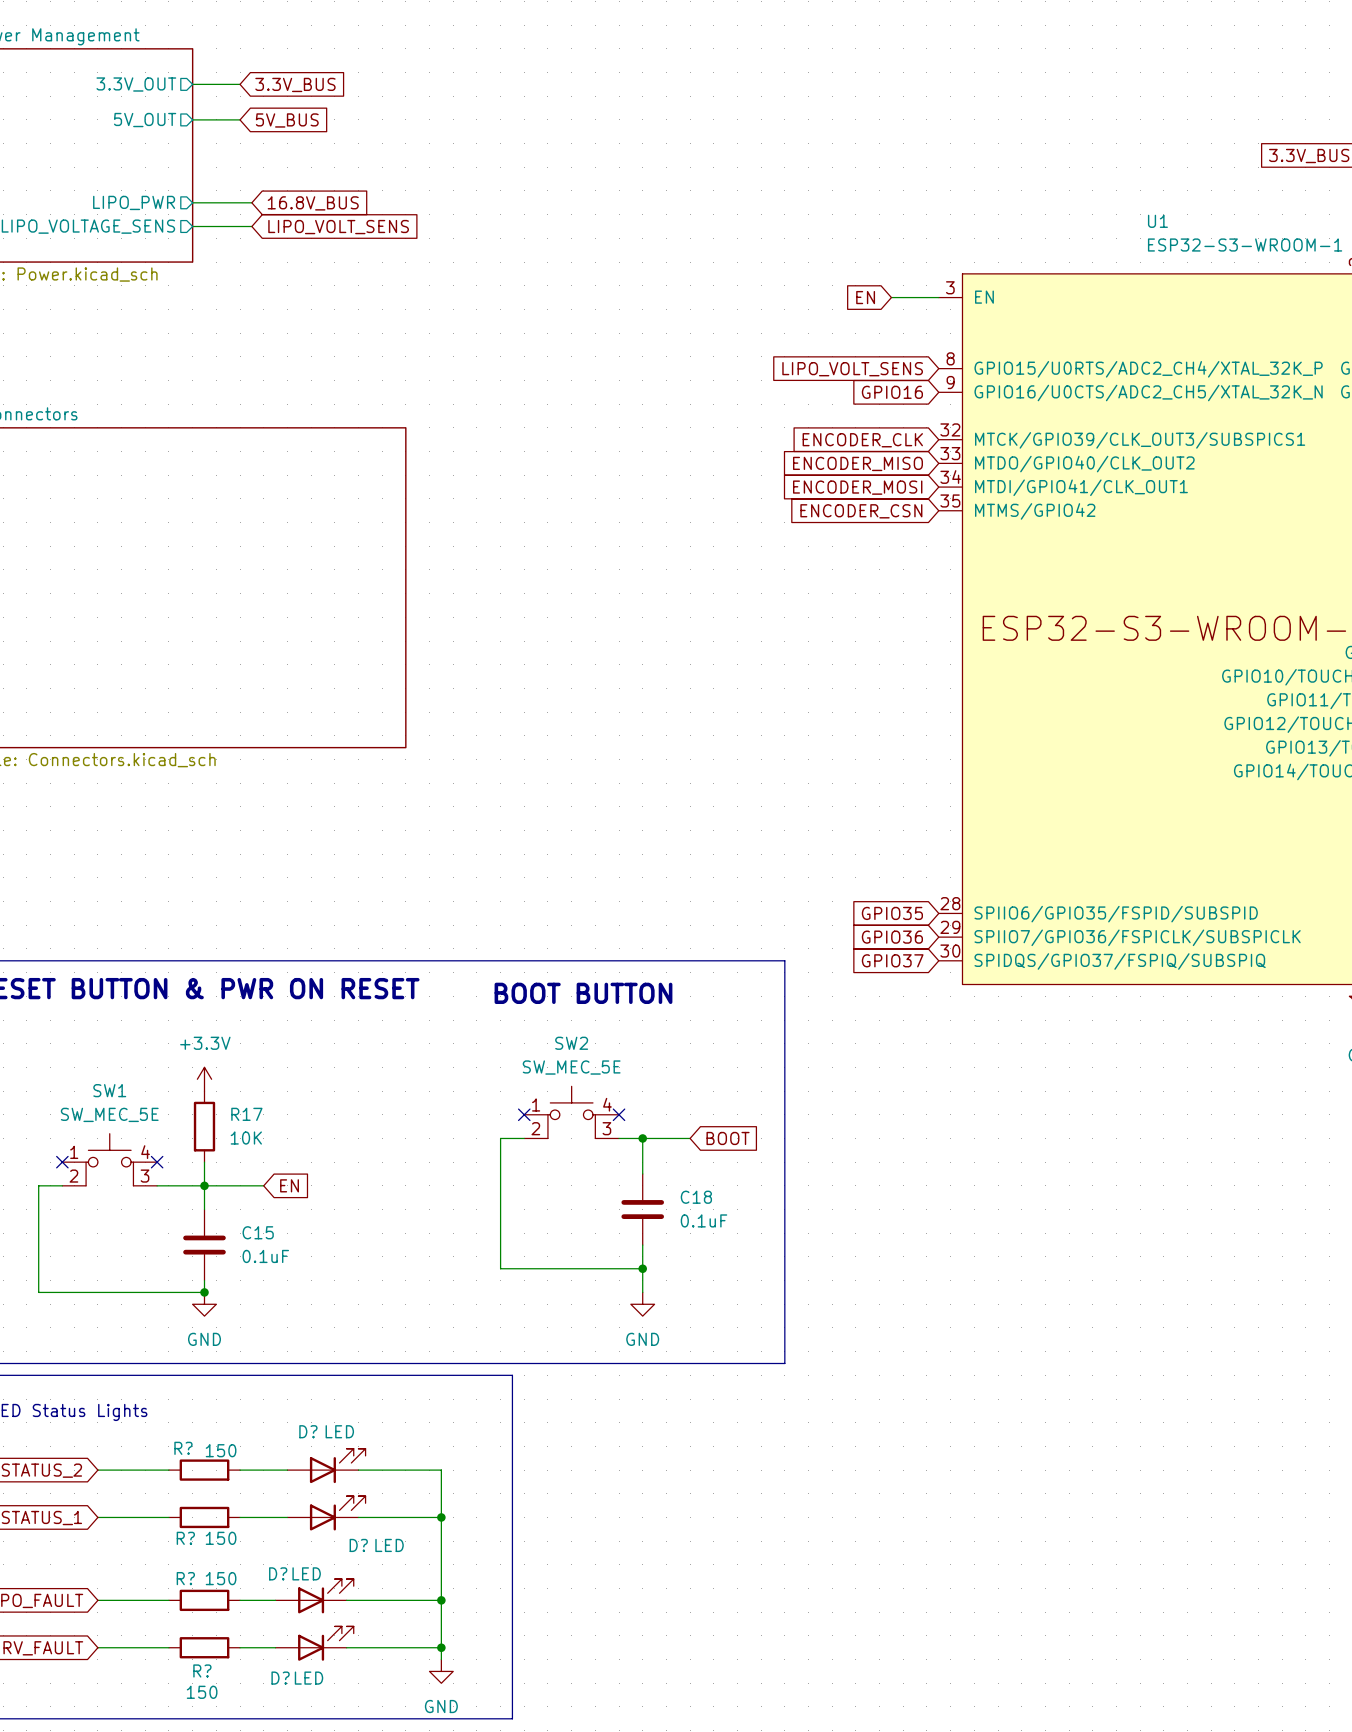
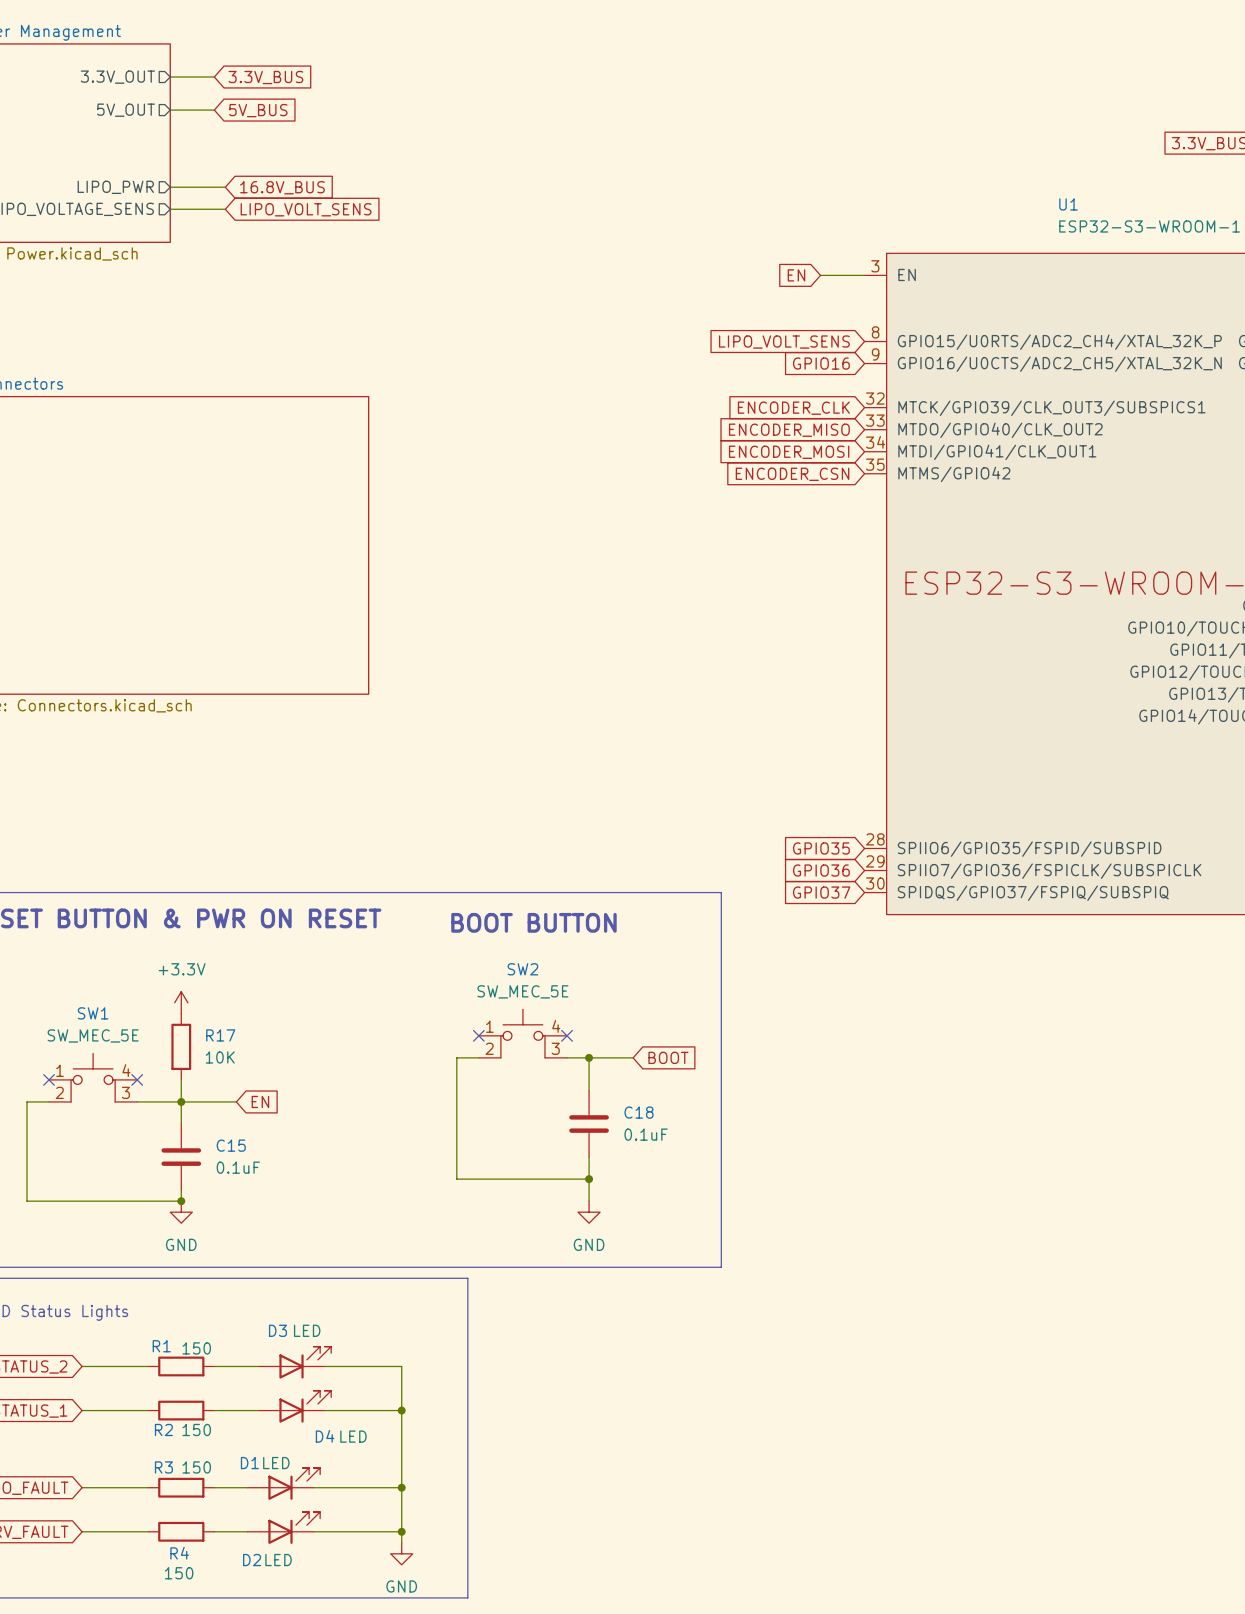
D? name: D? (308, 1431) -> D3 (277, 1330)
R? name: R? (183, 1448) -> R1 (161, 1346)
R? name: R? (185, 1538) -> R2 (163, 1429)
D? name: D? (358, 1545) -> D4 (325, 1436)
D? name: D? (278, 1573) -> D1 (249, 1463)
R? name: R? (185, 1578) -> R3 (163, 1467)
R? name: R? (202, 1670) -> R4 (179, 1553)
D? name: D? (280, 1678) -> D2 (252, 1560)

